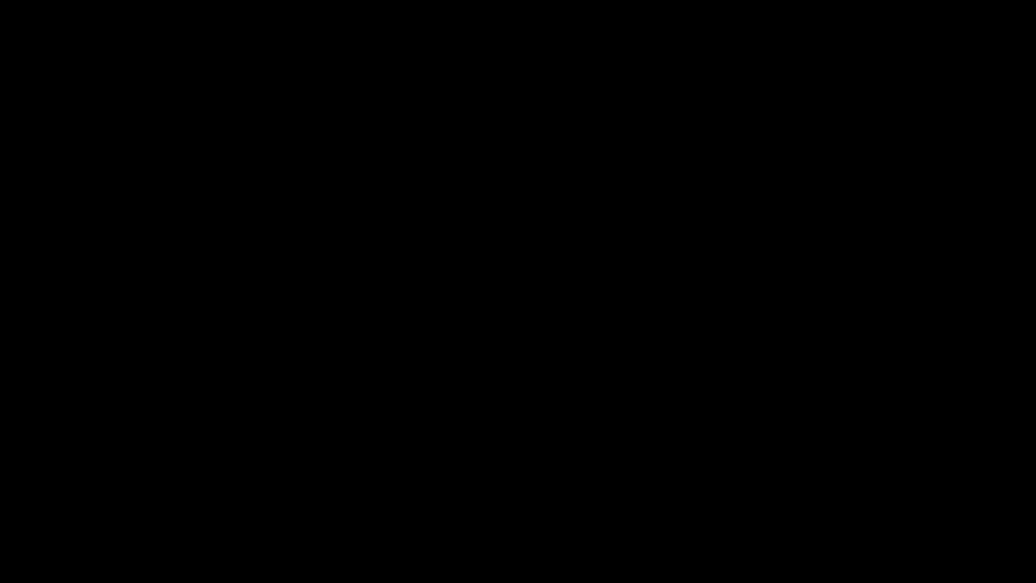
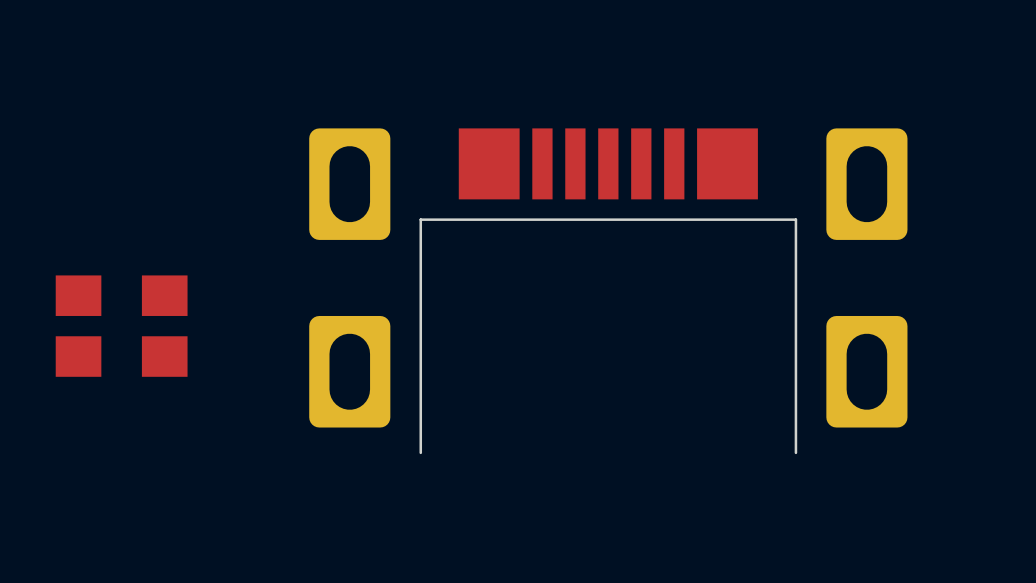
part: none -> (608, 291)
part: none -> (121, 295)
part: none -> (121, 356)

